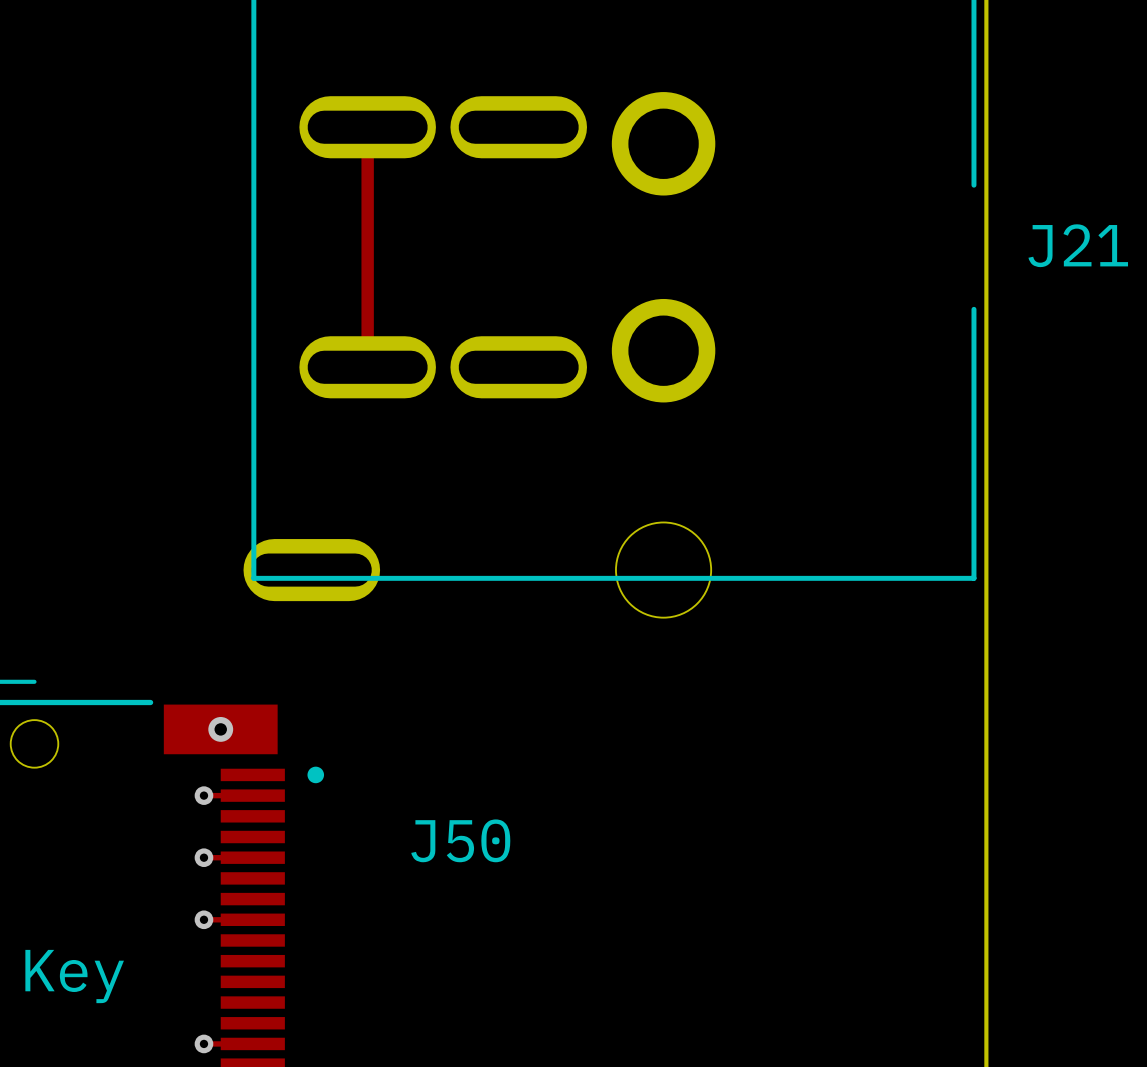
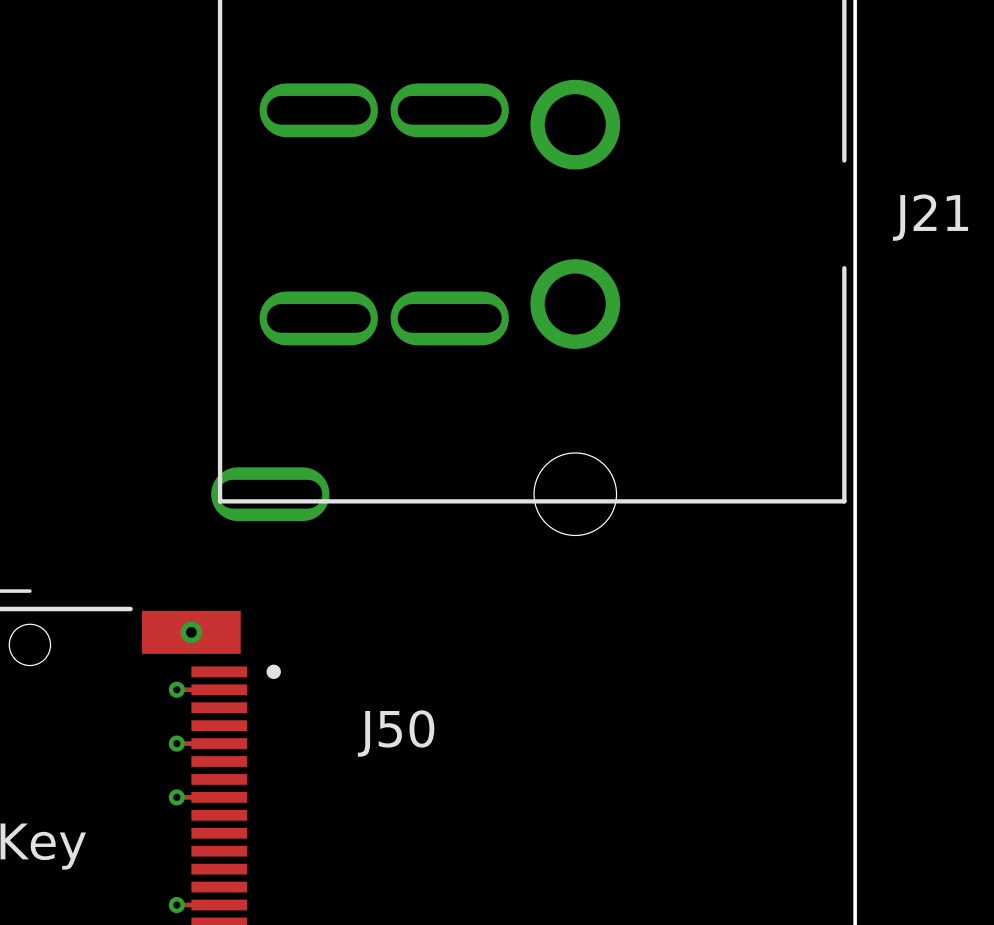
track: (367, 127) (367, 367) -> none

